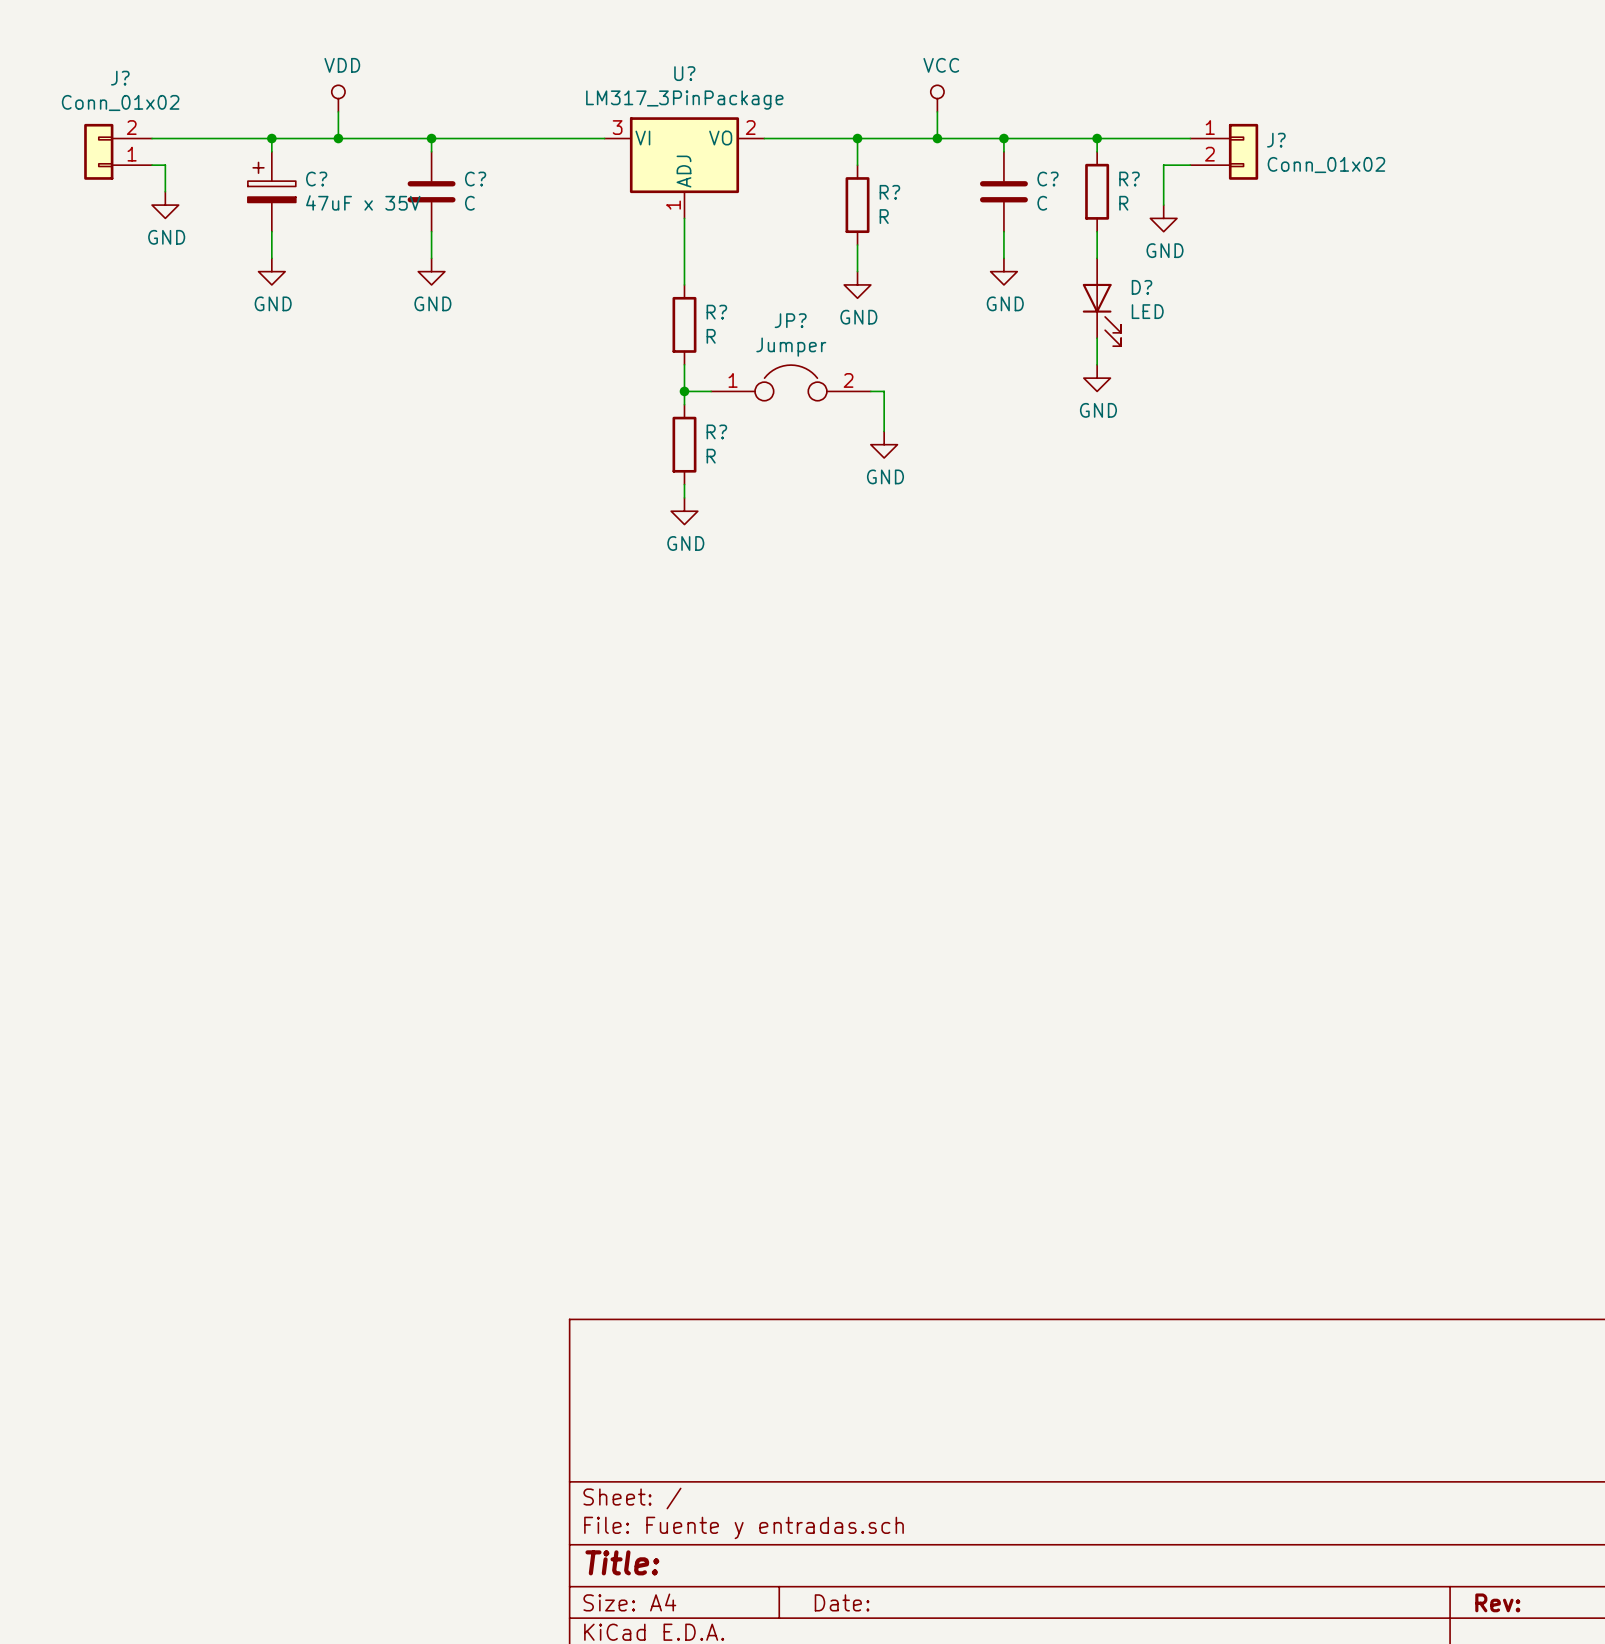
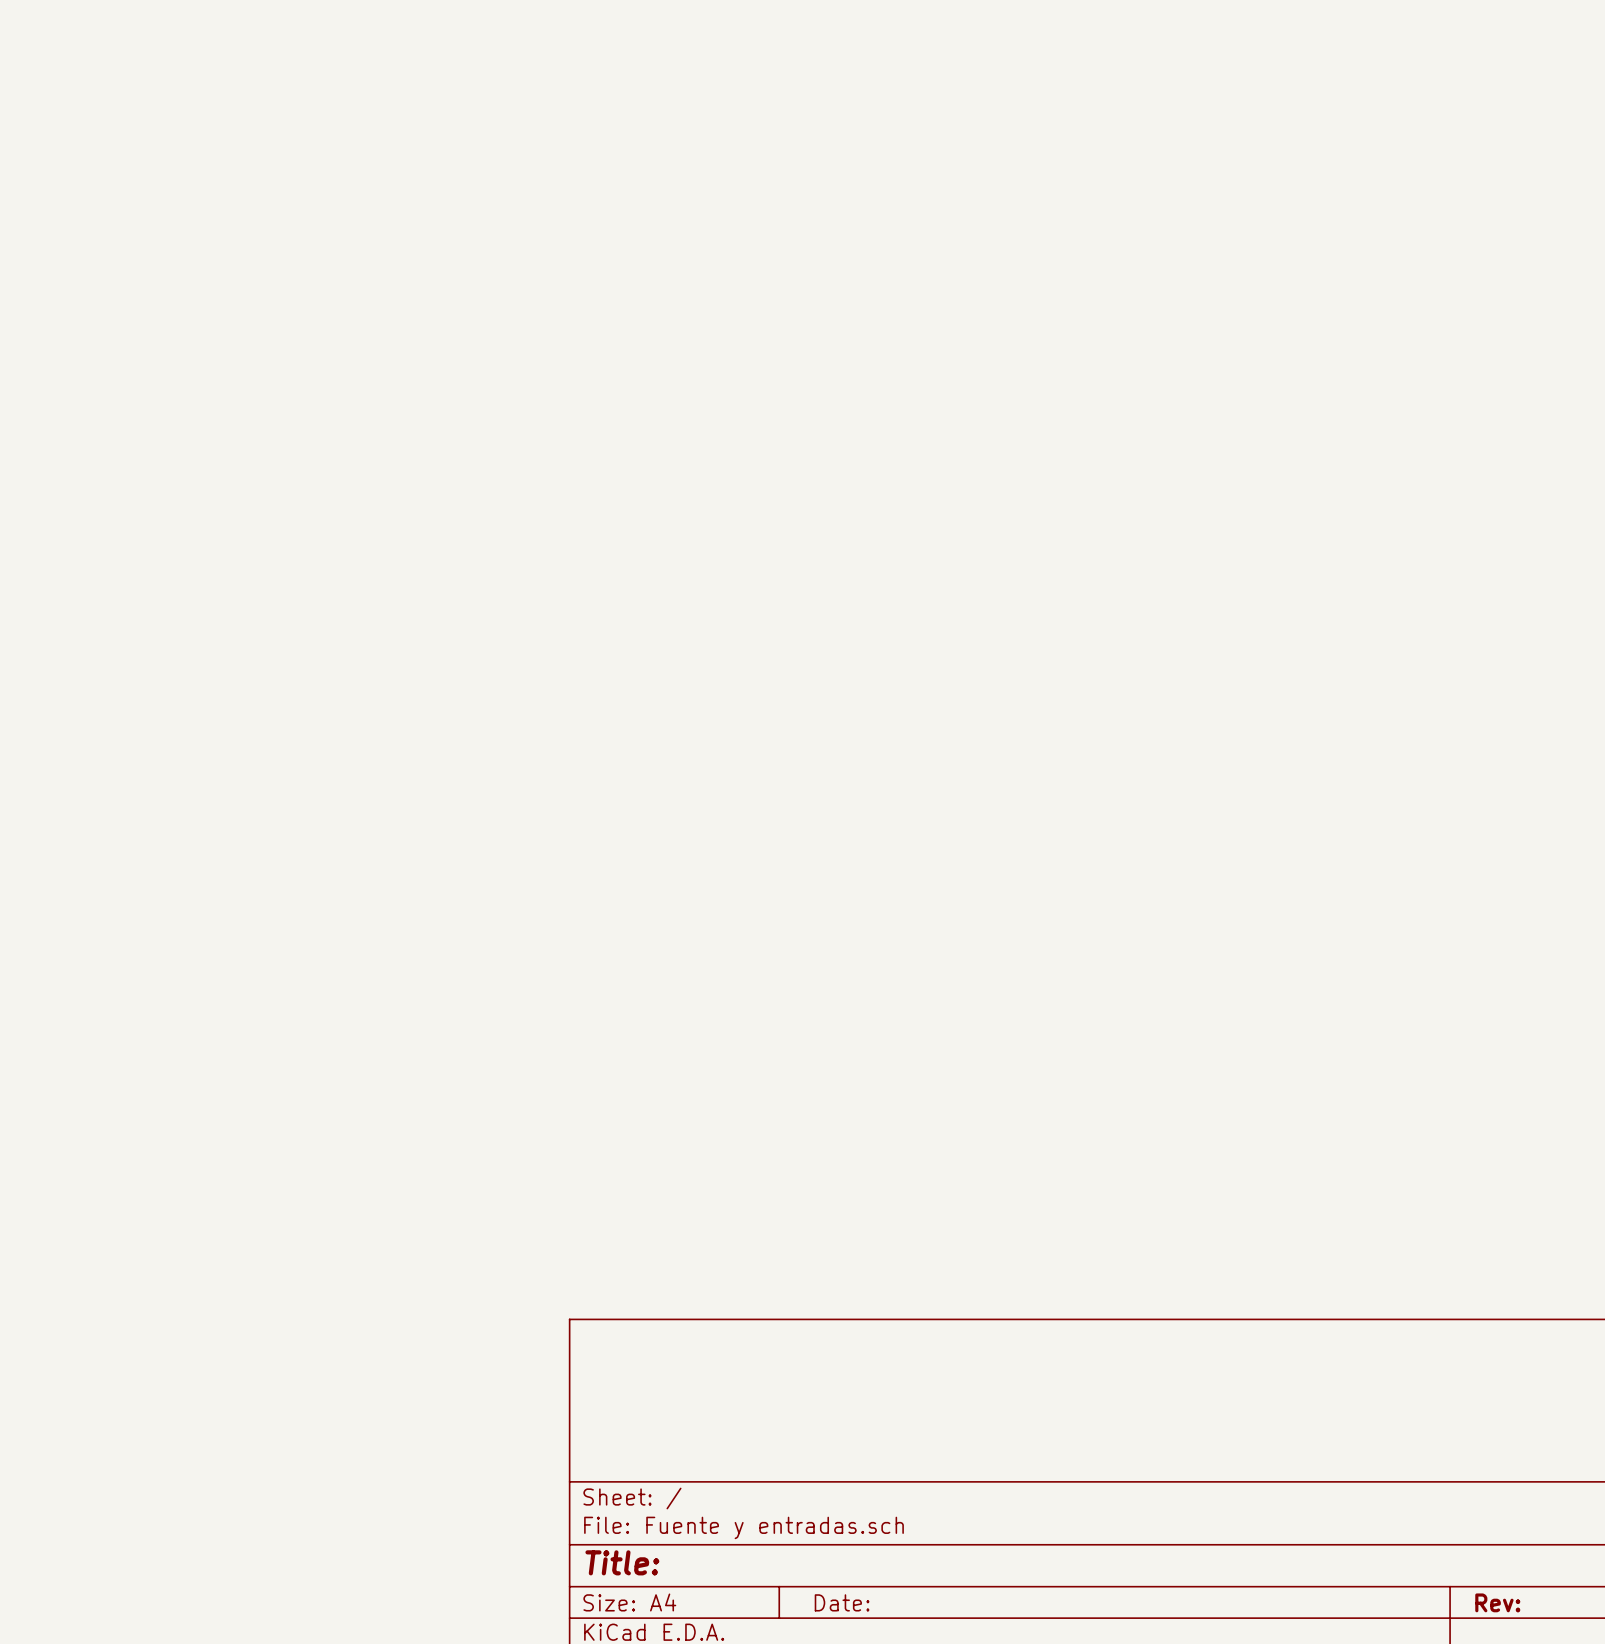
power symbol: VDD (338, 98) -> none
power symbol: VCC (937, 98) -> none
wire: (338, 111) (338, 138) -> none
wire: (937, 111) (937, 138) -> none
wire: (152, 138) (604, 138) -> none
wire: (271, 138) (271, 151) -> none
junction: (271, 138) -> none
junction: (338, 138) -> none
wire: (431, 138) (431, 151) -> none
junction: (431, 138) -> none
wire: (764, 138) (1190, 138) -> none
wire: (857, 138) (857, 165) -> none
junction: (857, 138) -> none
junction: (937, 138) -> none
wire: (1003, 138) (1003, 151) -> none
junction: (1003, 138) -> none
wire: (1097, 138) (1097, 151) -> none
junction: (1097, 138) -> none
J?: Conn_01x02 (118, 151) -> none
J?: Conn_01x02 (1224, 151) -> none
wire: (152, 165) (165, 165) (165, 191) -> none
wire: (1190, 165) (1163, 165) (1163, 205) -> none
U?: LM317_3PinPackage (684, 167) -> none
C?: 47uF x 35V (271, 191) -> none
C?: C (431, 191) -> none
C?: C (1003, 191) -> none
R?: R (1097, 191) -> none
power symbol: GND (165, 205) -> none
R?: R (857, 205) -> none
wire: (684, 218) (684, 284) -> none
power symbol: GND (1163, 218) -> none
wire: (271, 231) (271, 258) -> none
wire: (431, 231) (431, 258) -> none
wire: (1003, 231) (1003, 258) -> none
wire: (1097, 231) (1097, 258) -> none
wire: (857, 245) (857, 271) -> none
power symbol: GND (271, 271) -> none
power symbol: GND (431, 271) -> none
power symbol: GND (1003, 271) -> none
power symbol: GND (857, 284) -> none
D?: LED (1101, 302) -> none
R?: R (684, 324) -> none
wire: (1097, 338) (1097, 364) -> none
wire: (684, 364) (684, 404) -> none
power symbol: GND (1097, 378) -> none
JP?: Jumper (790, 382) -> none
wire: (684, 391) (711, 391) -> none
junction: (684, 391) -> none
wire: (870, 391) (884, 391) (884, 431) -> none
R?: R (684, 444) -> none
power symbol: GND (884, 444) -> none
wire: (684, 484) (684, 497) -> none
power symbol: GND (684, 511) -> none

